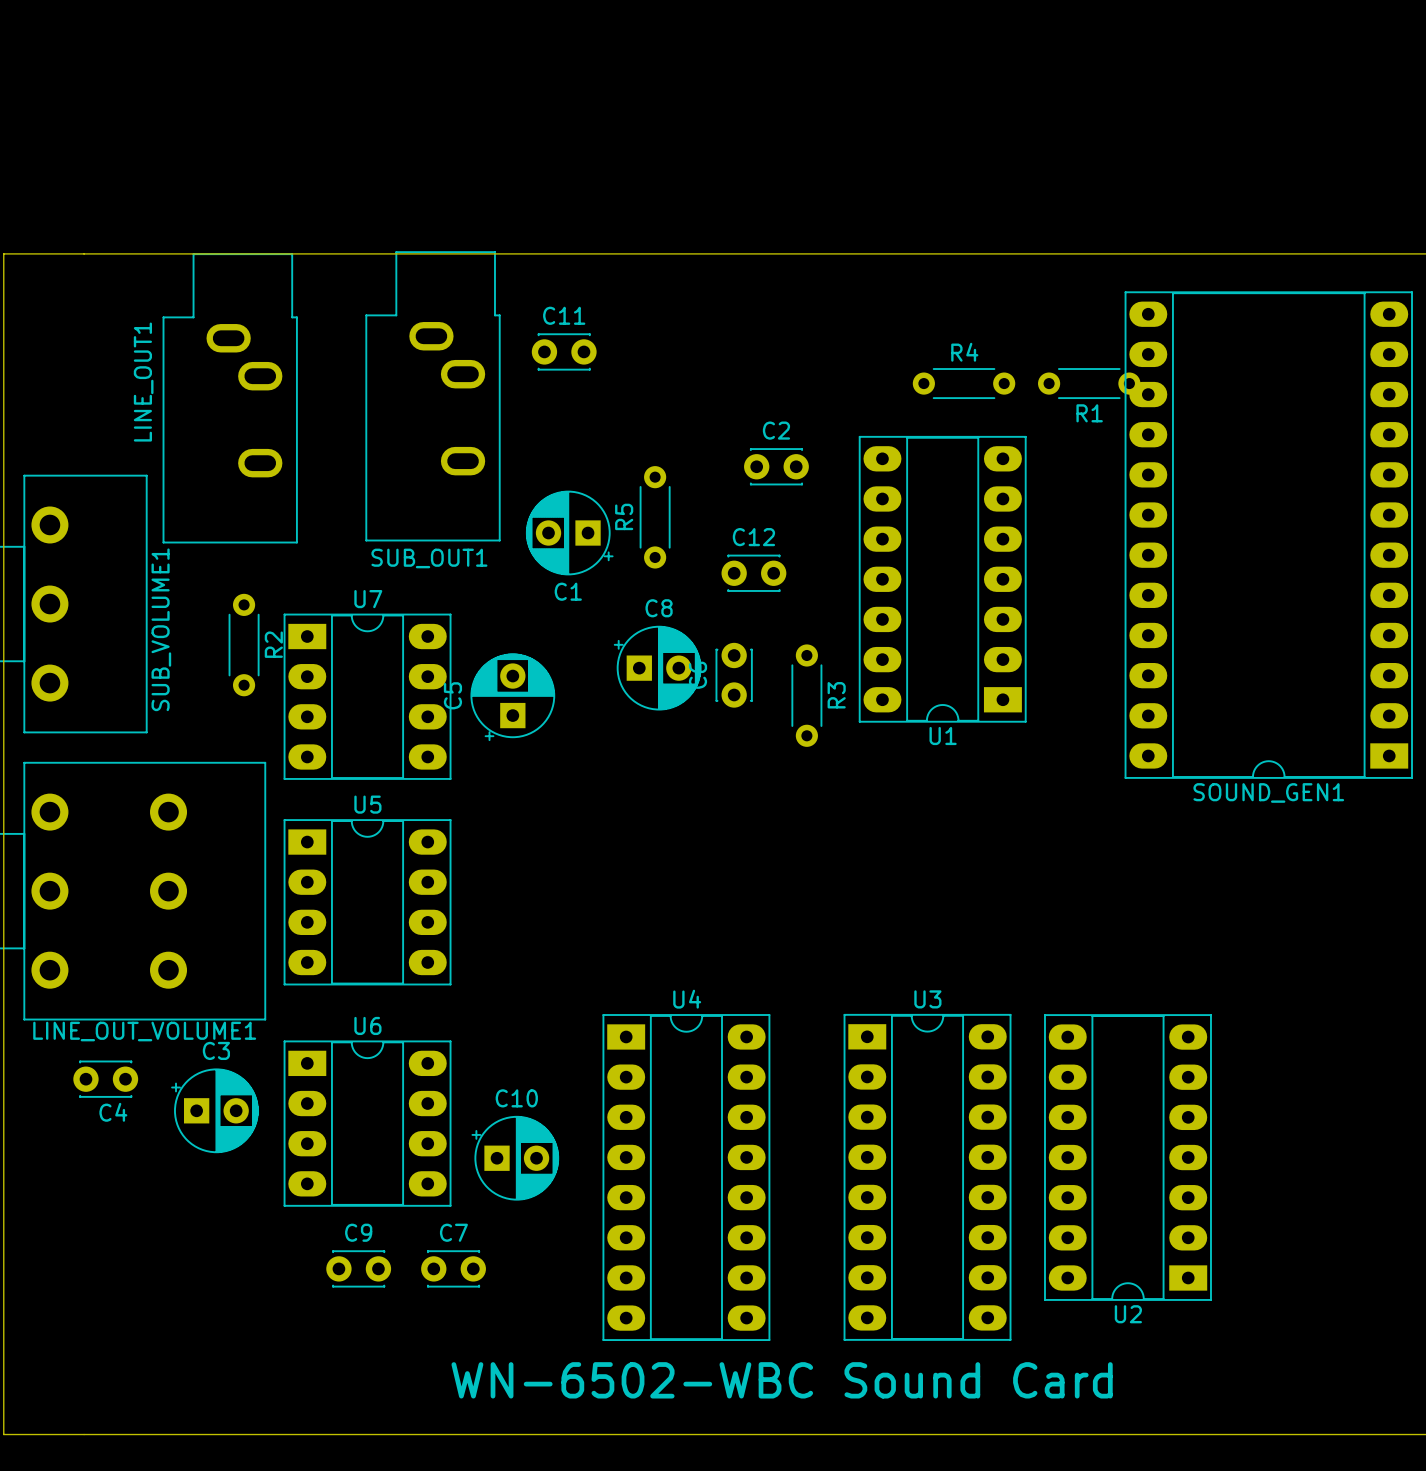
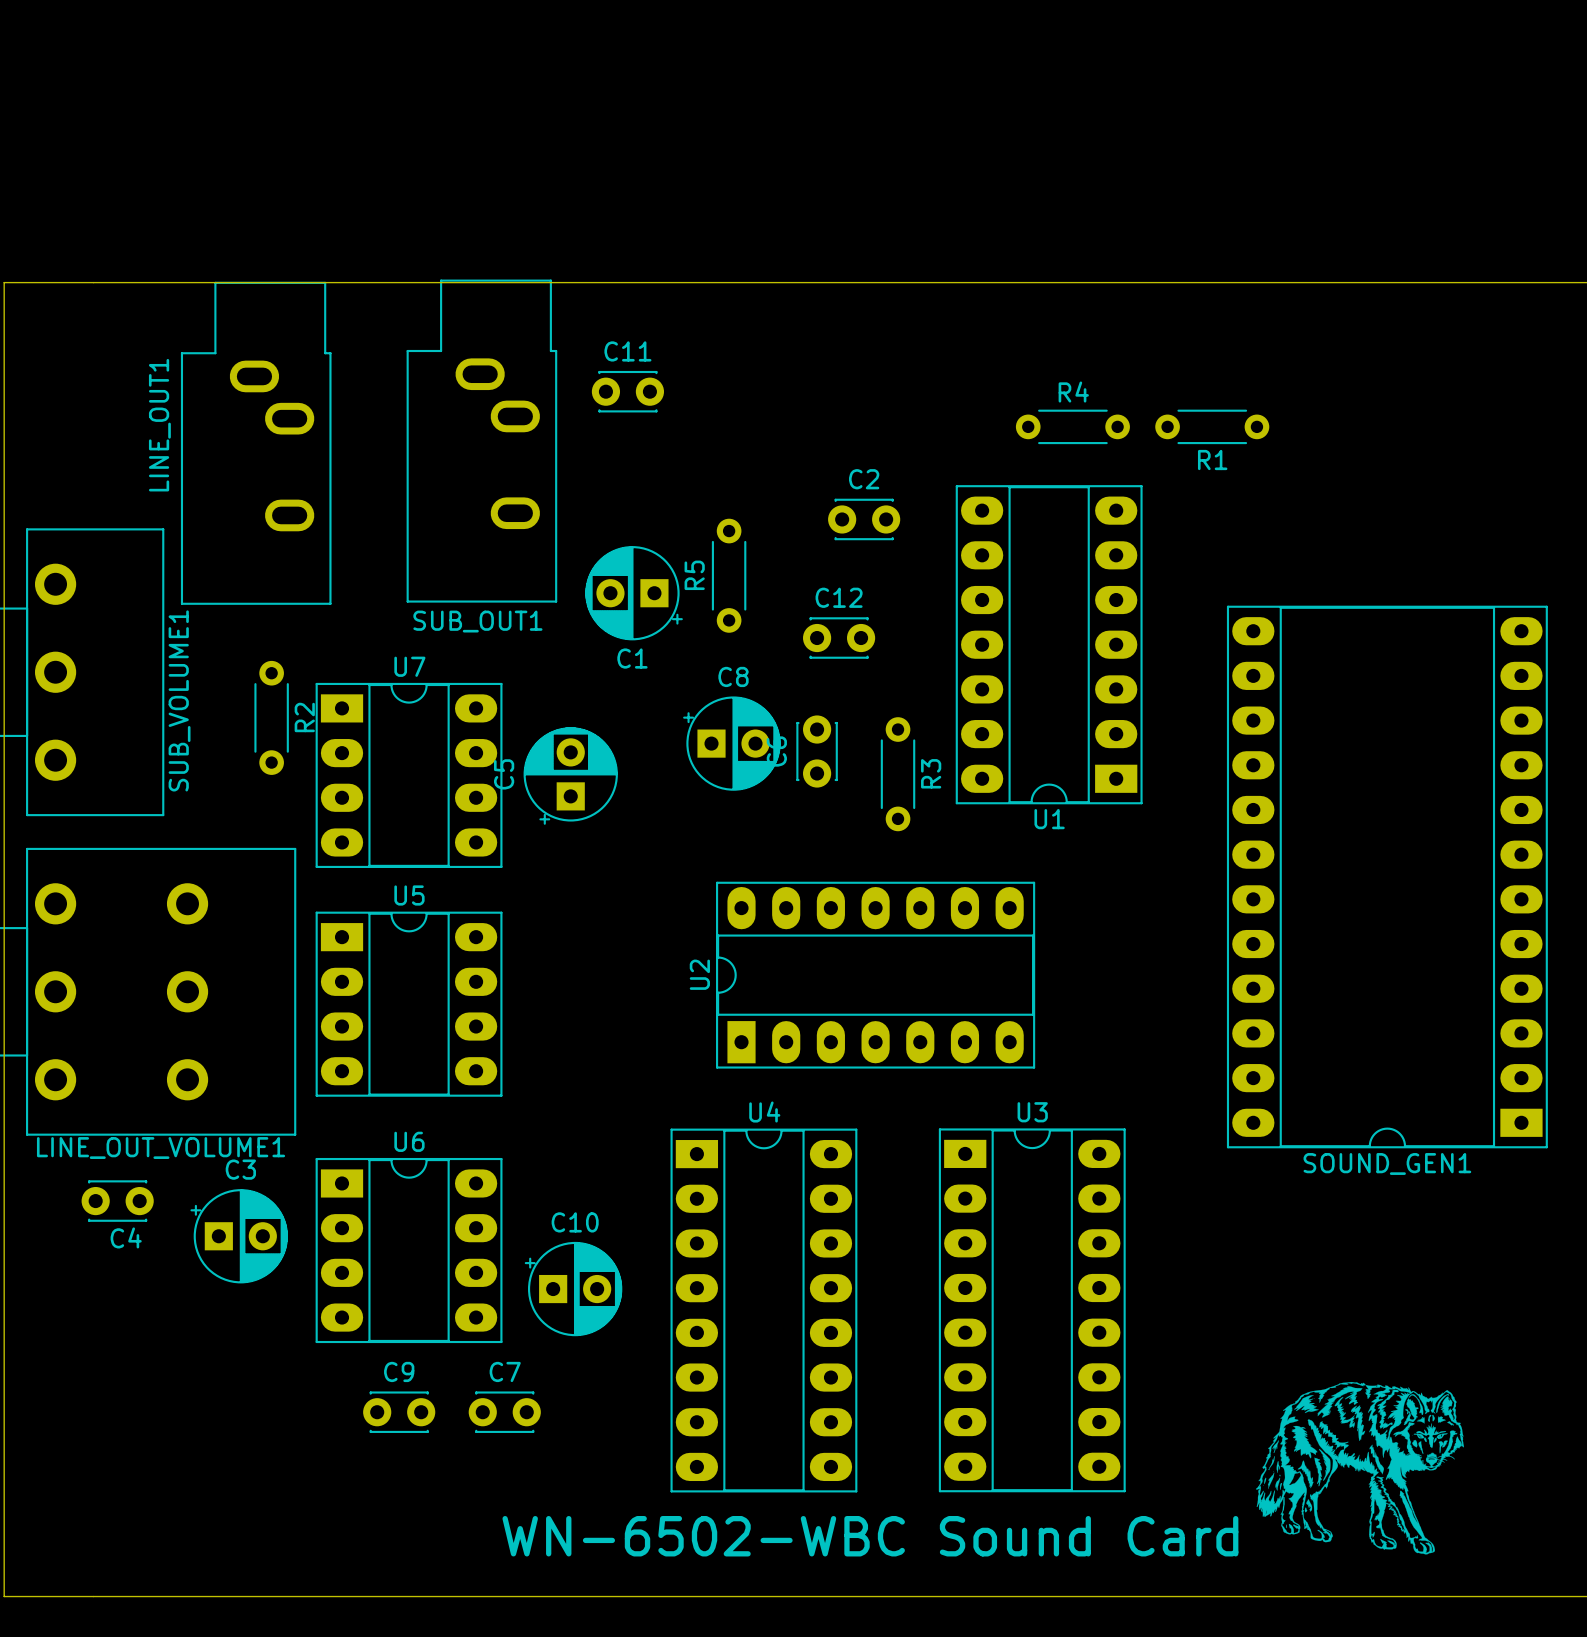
SOUND_GEN1 position: (1268, 535) -> (1387, 877)
U2 rotation: 0° (1127, 1157) -> 90° clockwise (875, 975)
U2 position: (1127, 1157) -> (875, 975)
drawing: none -> [1255, 1381, 1464, 1555]

